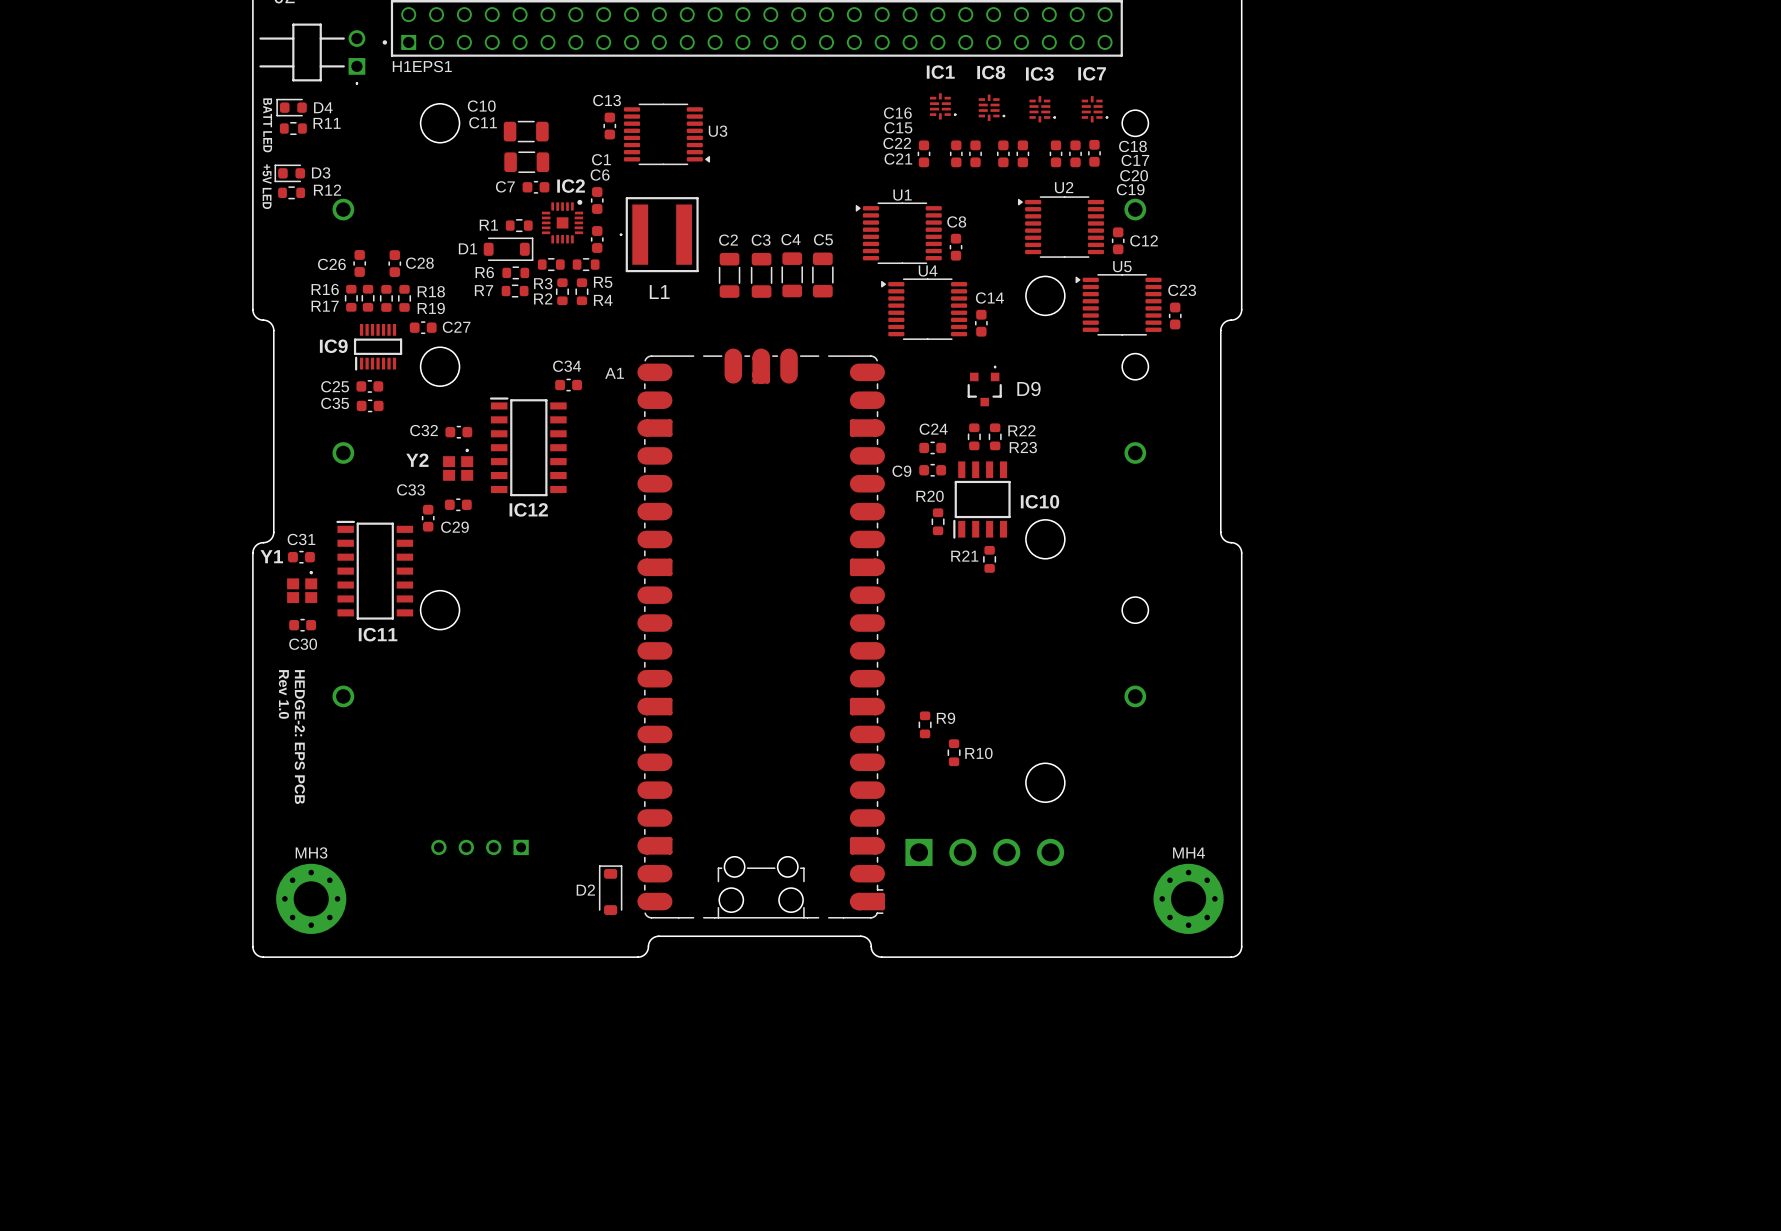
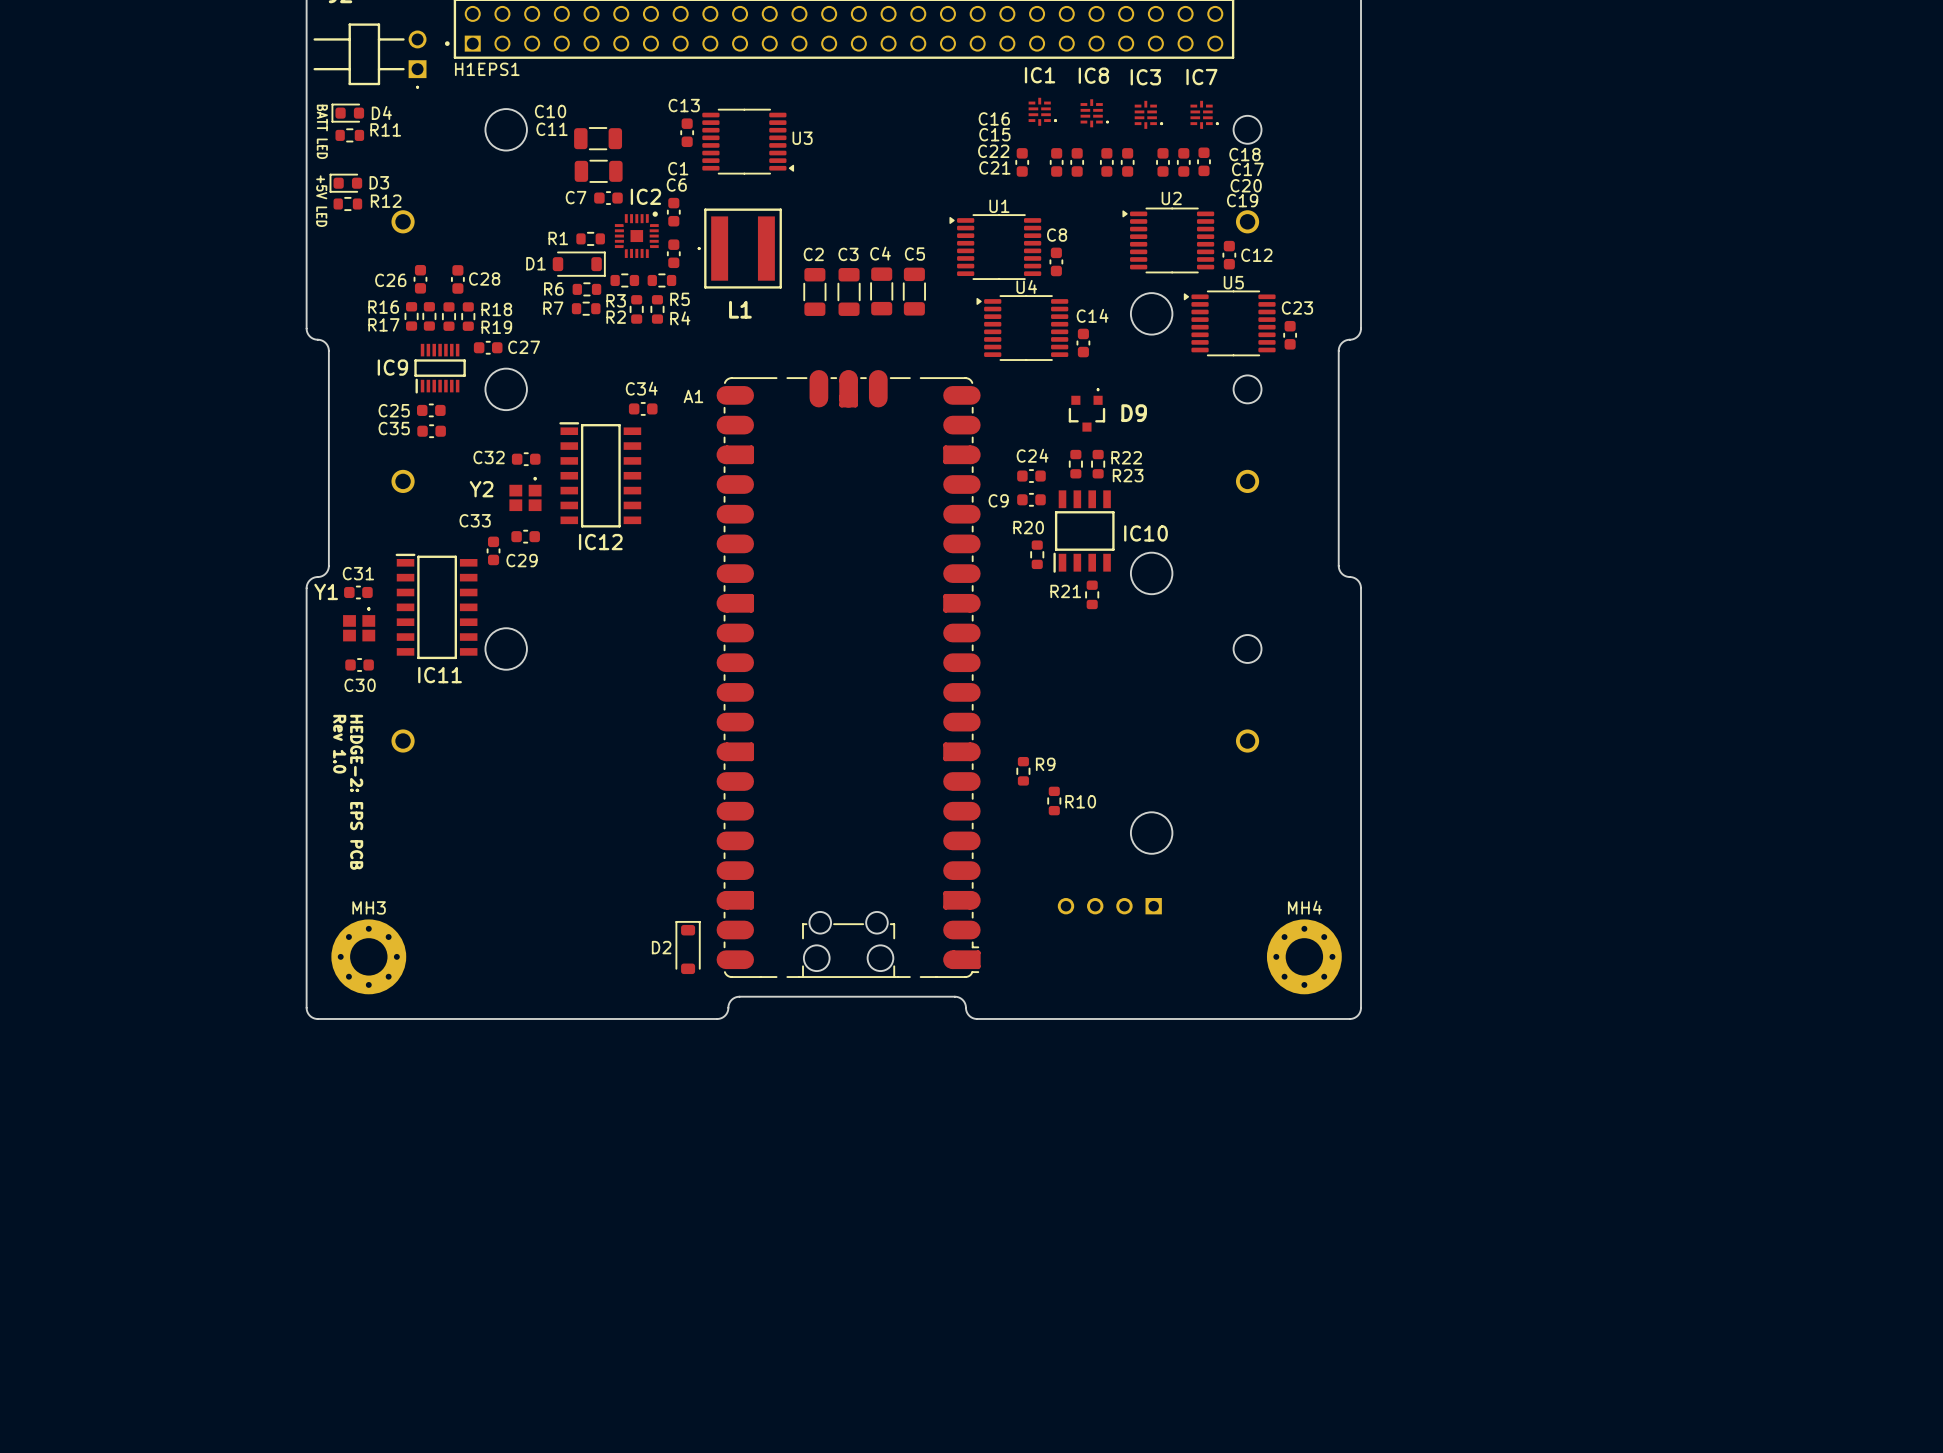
part: (480, 847) -> none
part: none -> (1109, 906)
part: (984, 852) -> none

